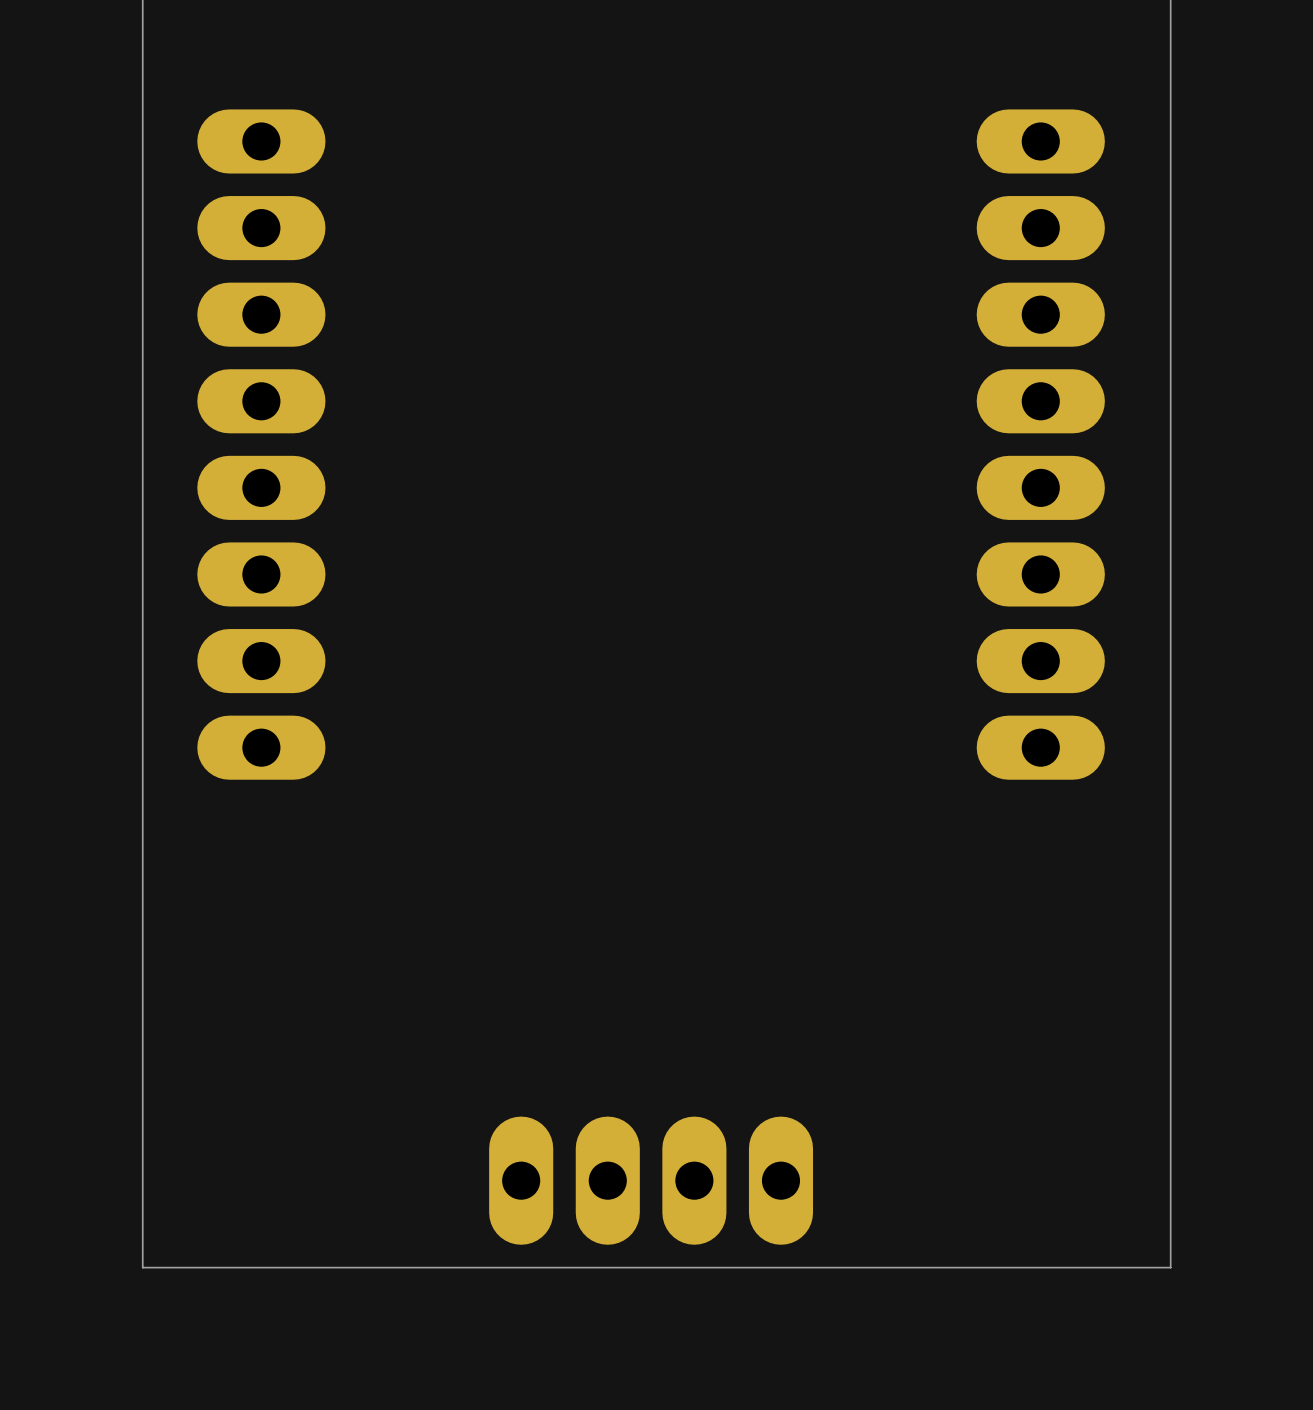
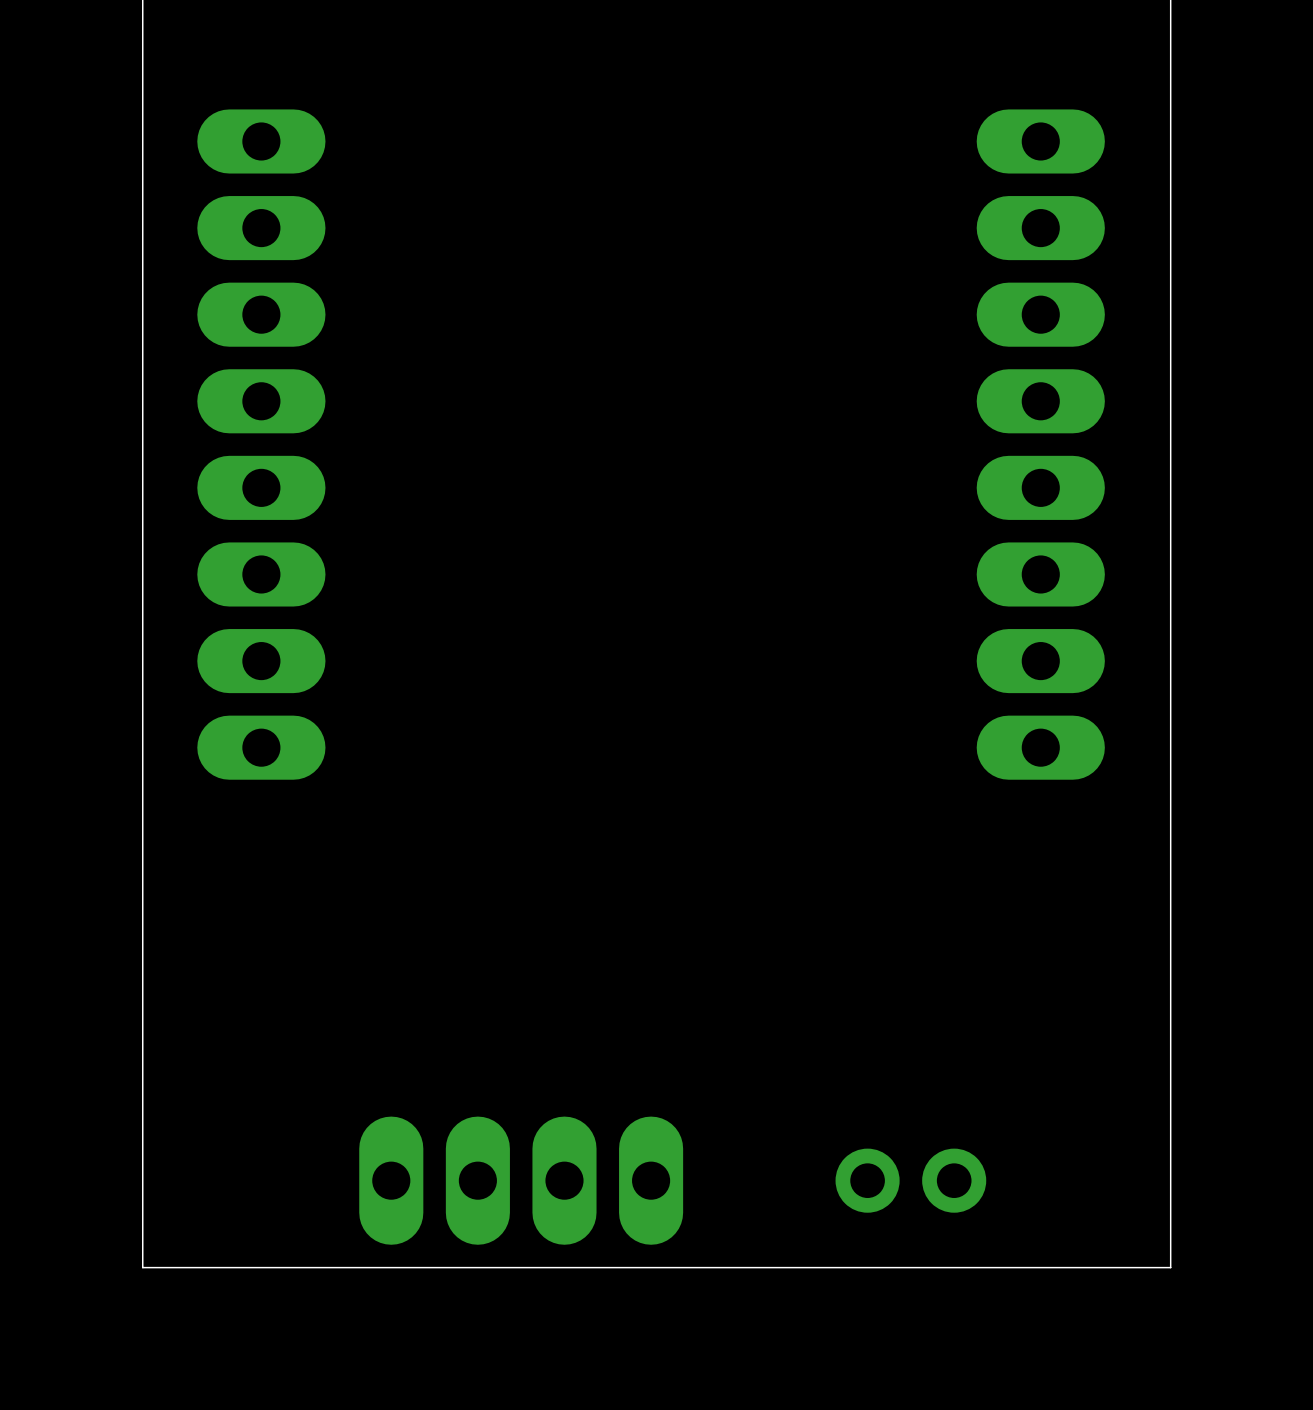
part position: (651, 1180) -> (521, 1180)
part: none -> (910, 1180)

